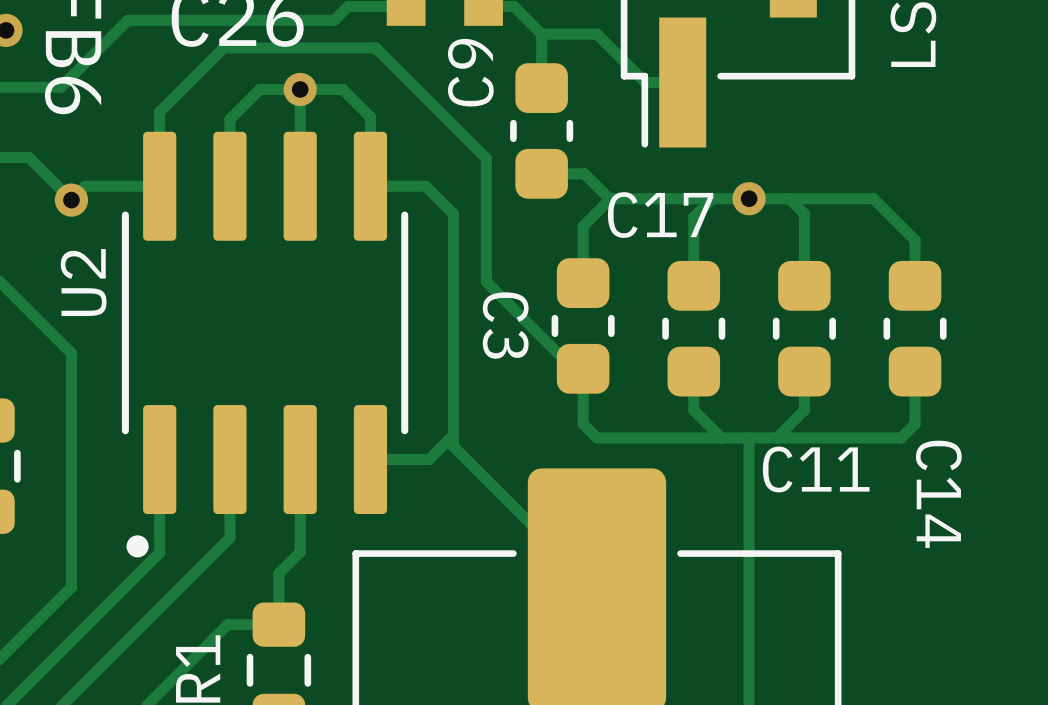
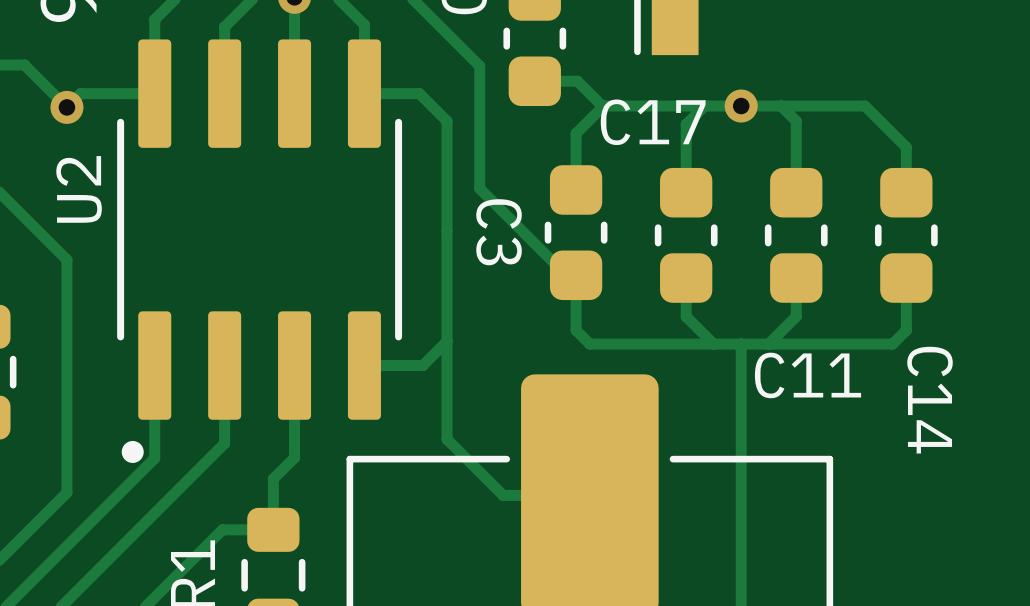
track: (453, 446) (596, 590) -> (447, 352) (447, 439) (503, 495) (589, 495)

